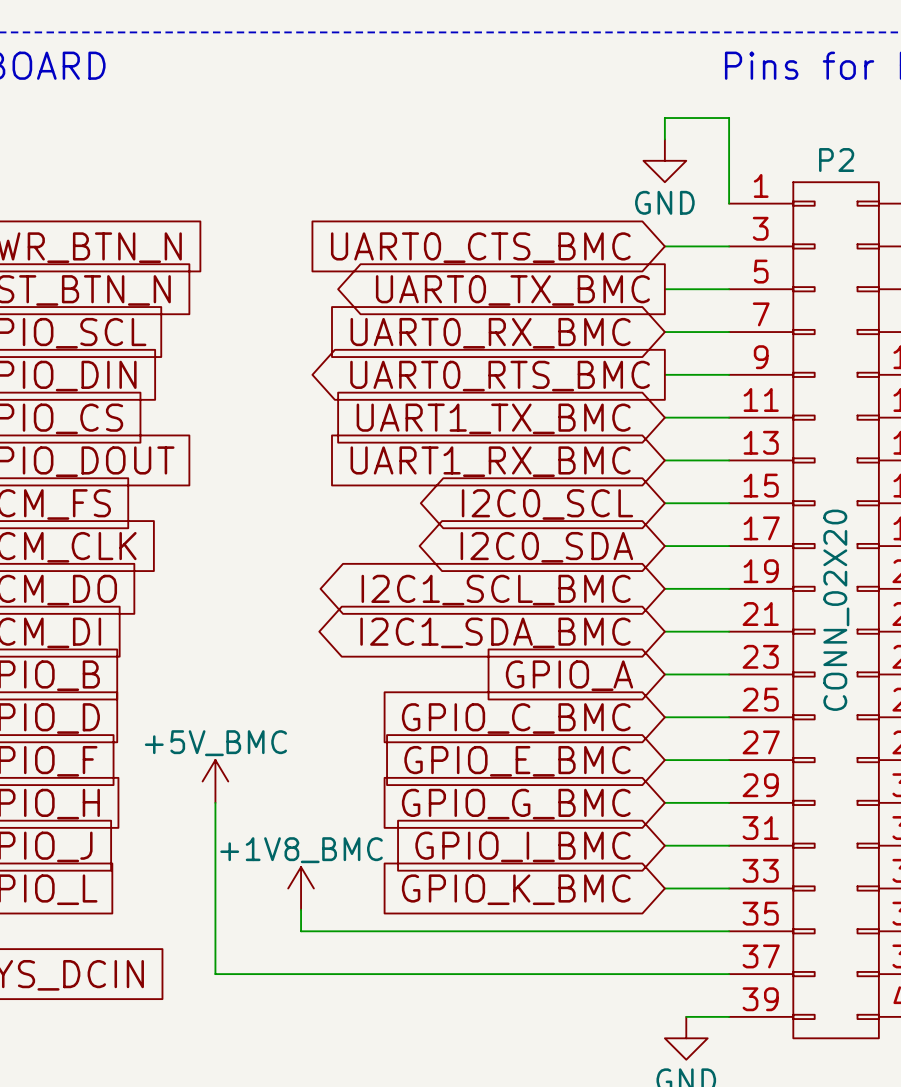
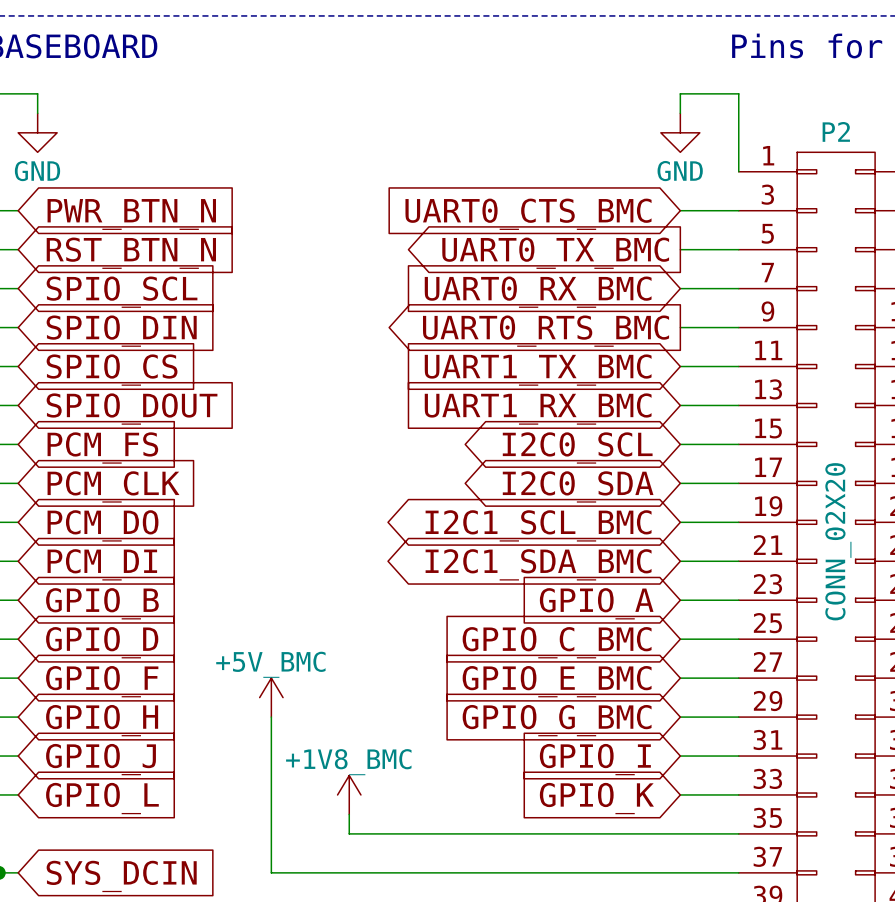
global label: GPIO_I_BMC (523, 846) -> GPIO_I (595, 759)
global label: GPIO_K_BMC (516, 889) -> GPIO_K (596, 798)

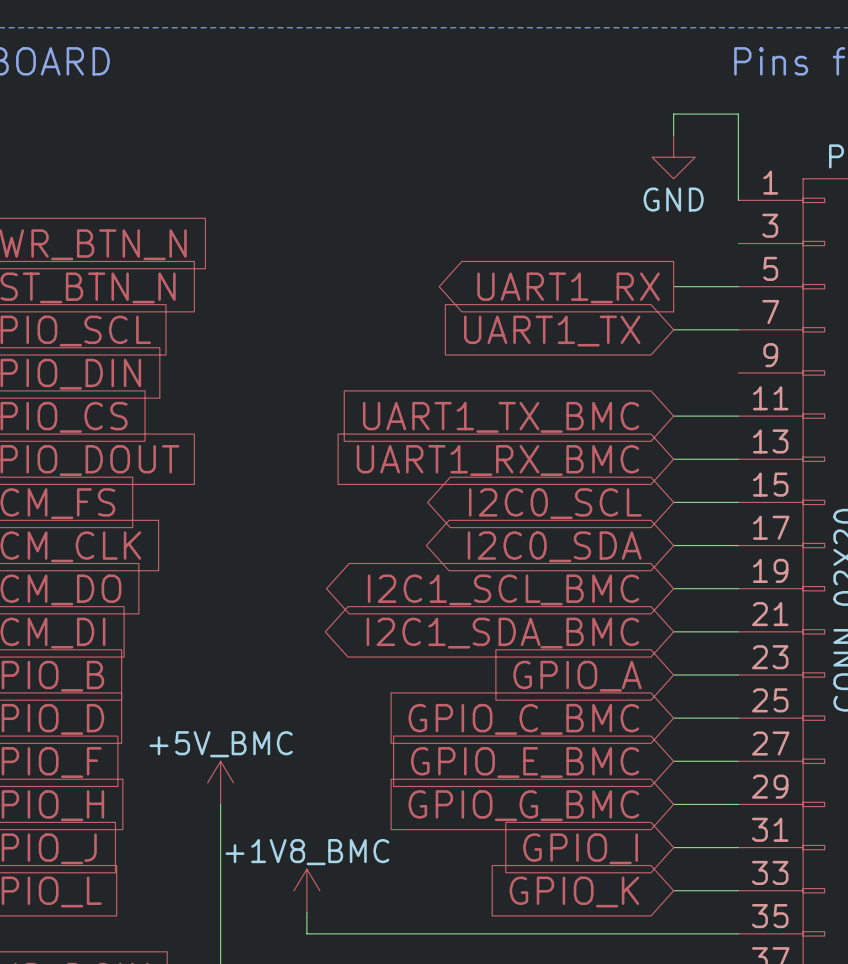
wire: (680, 210) (738, 210) -> none
global label: UART0_CTS_BMC (528, 214) -> none
global label: UART0_TX_BMC (555, 253) -> UART1_RX (568, 287)
global label: UART0_RX_BMC (538, 292) -> UART1_TX (552, 331)
wire: (680, 327) (738, 327) -> none
global label: UART0_RTS_BMC (546, 331) -> none

